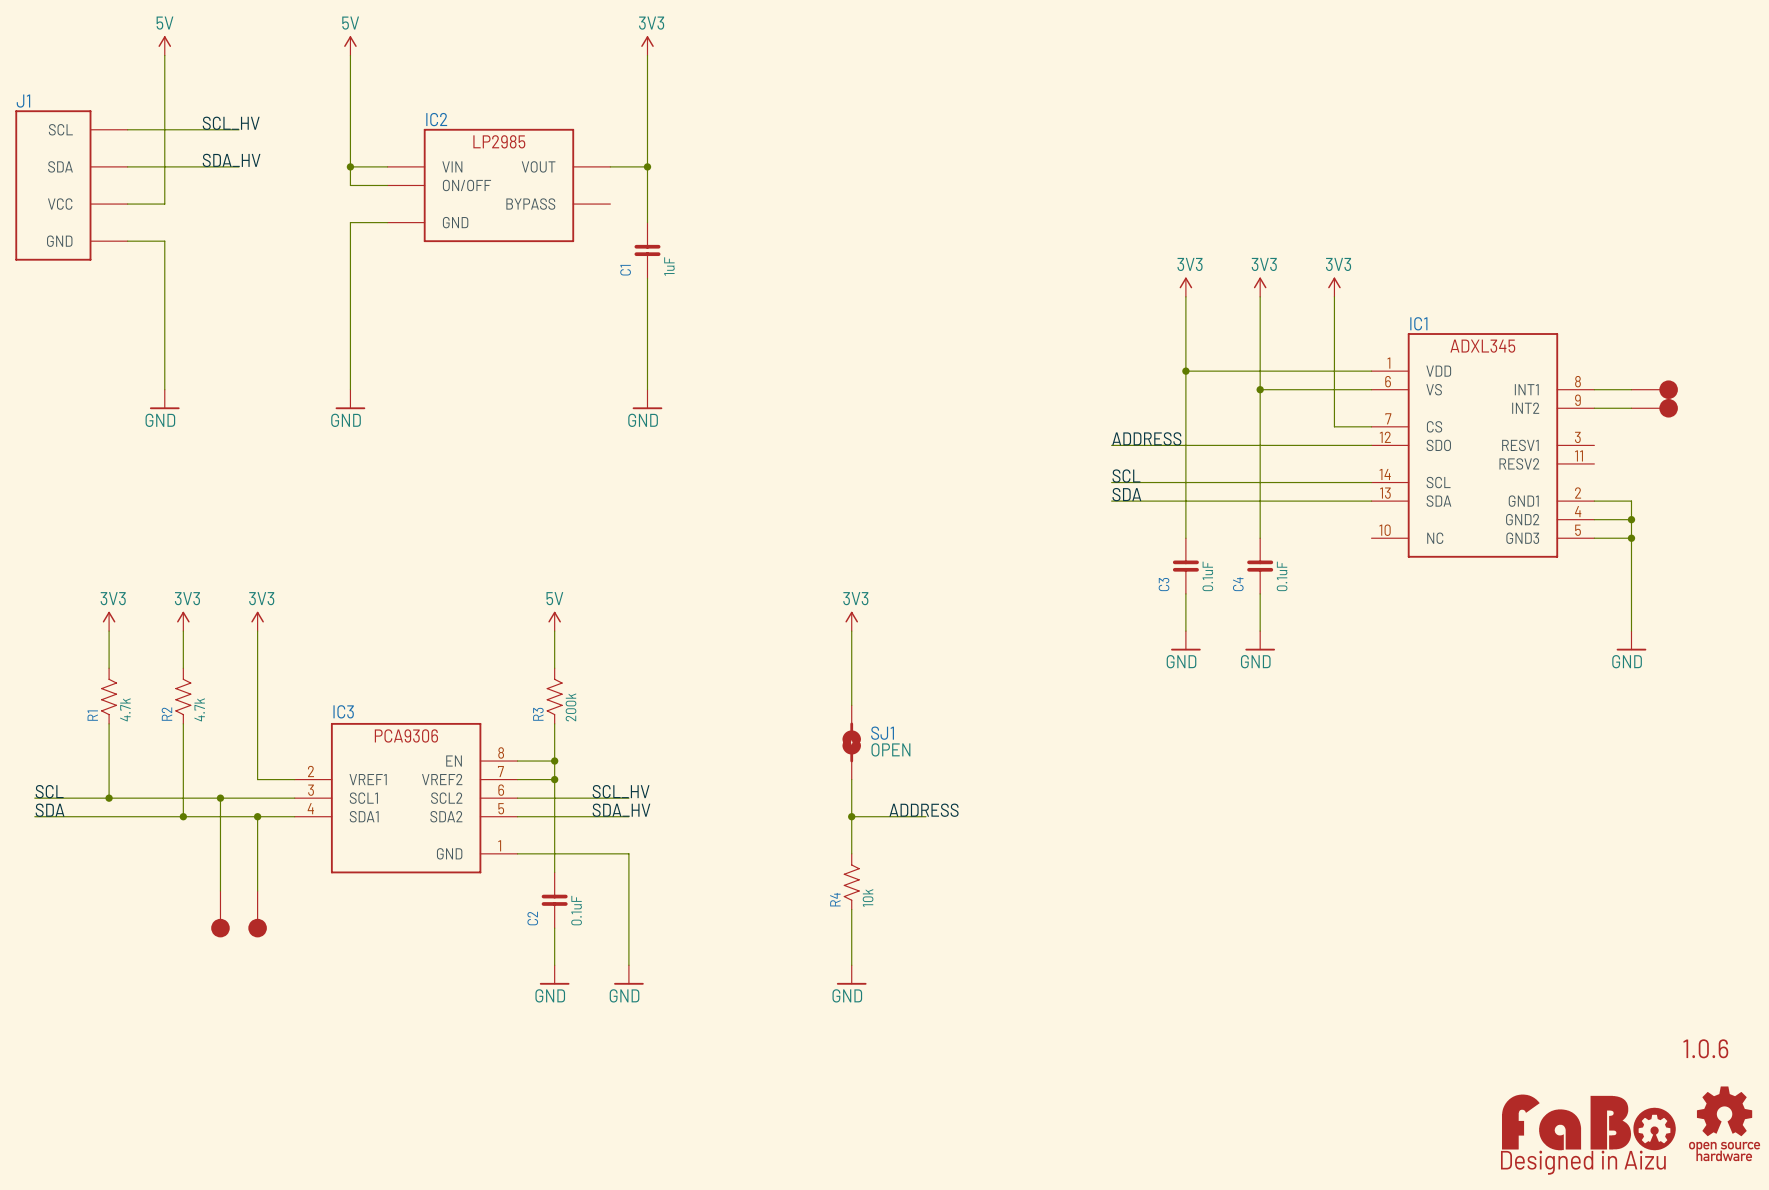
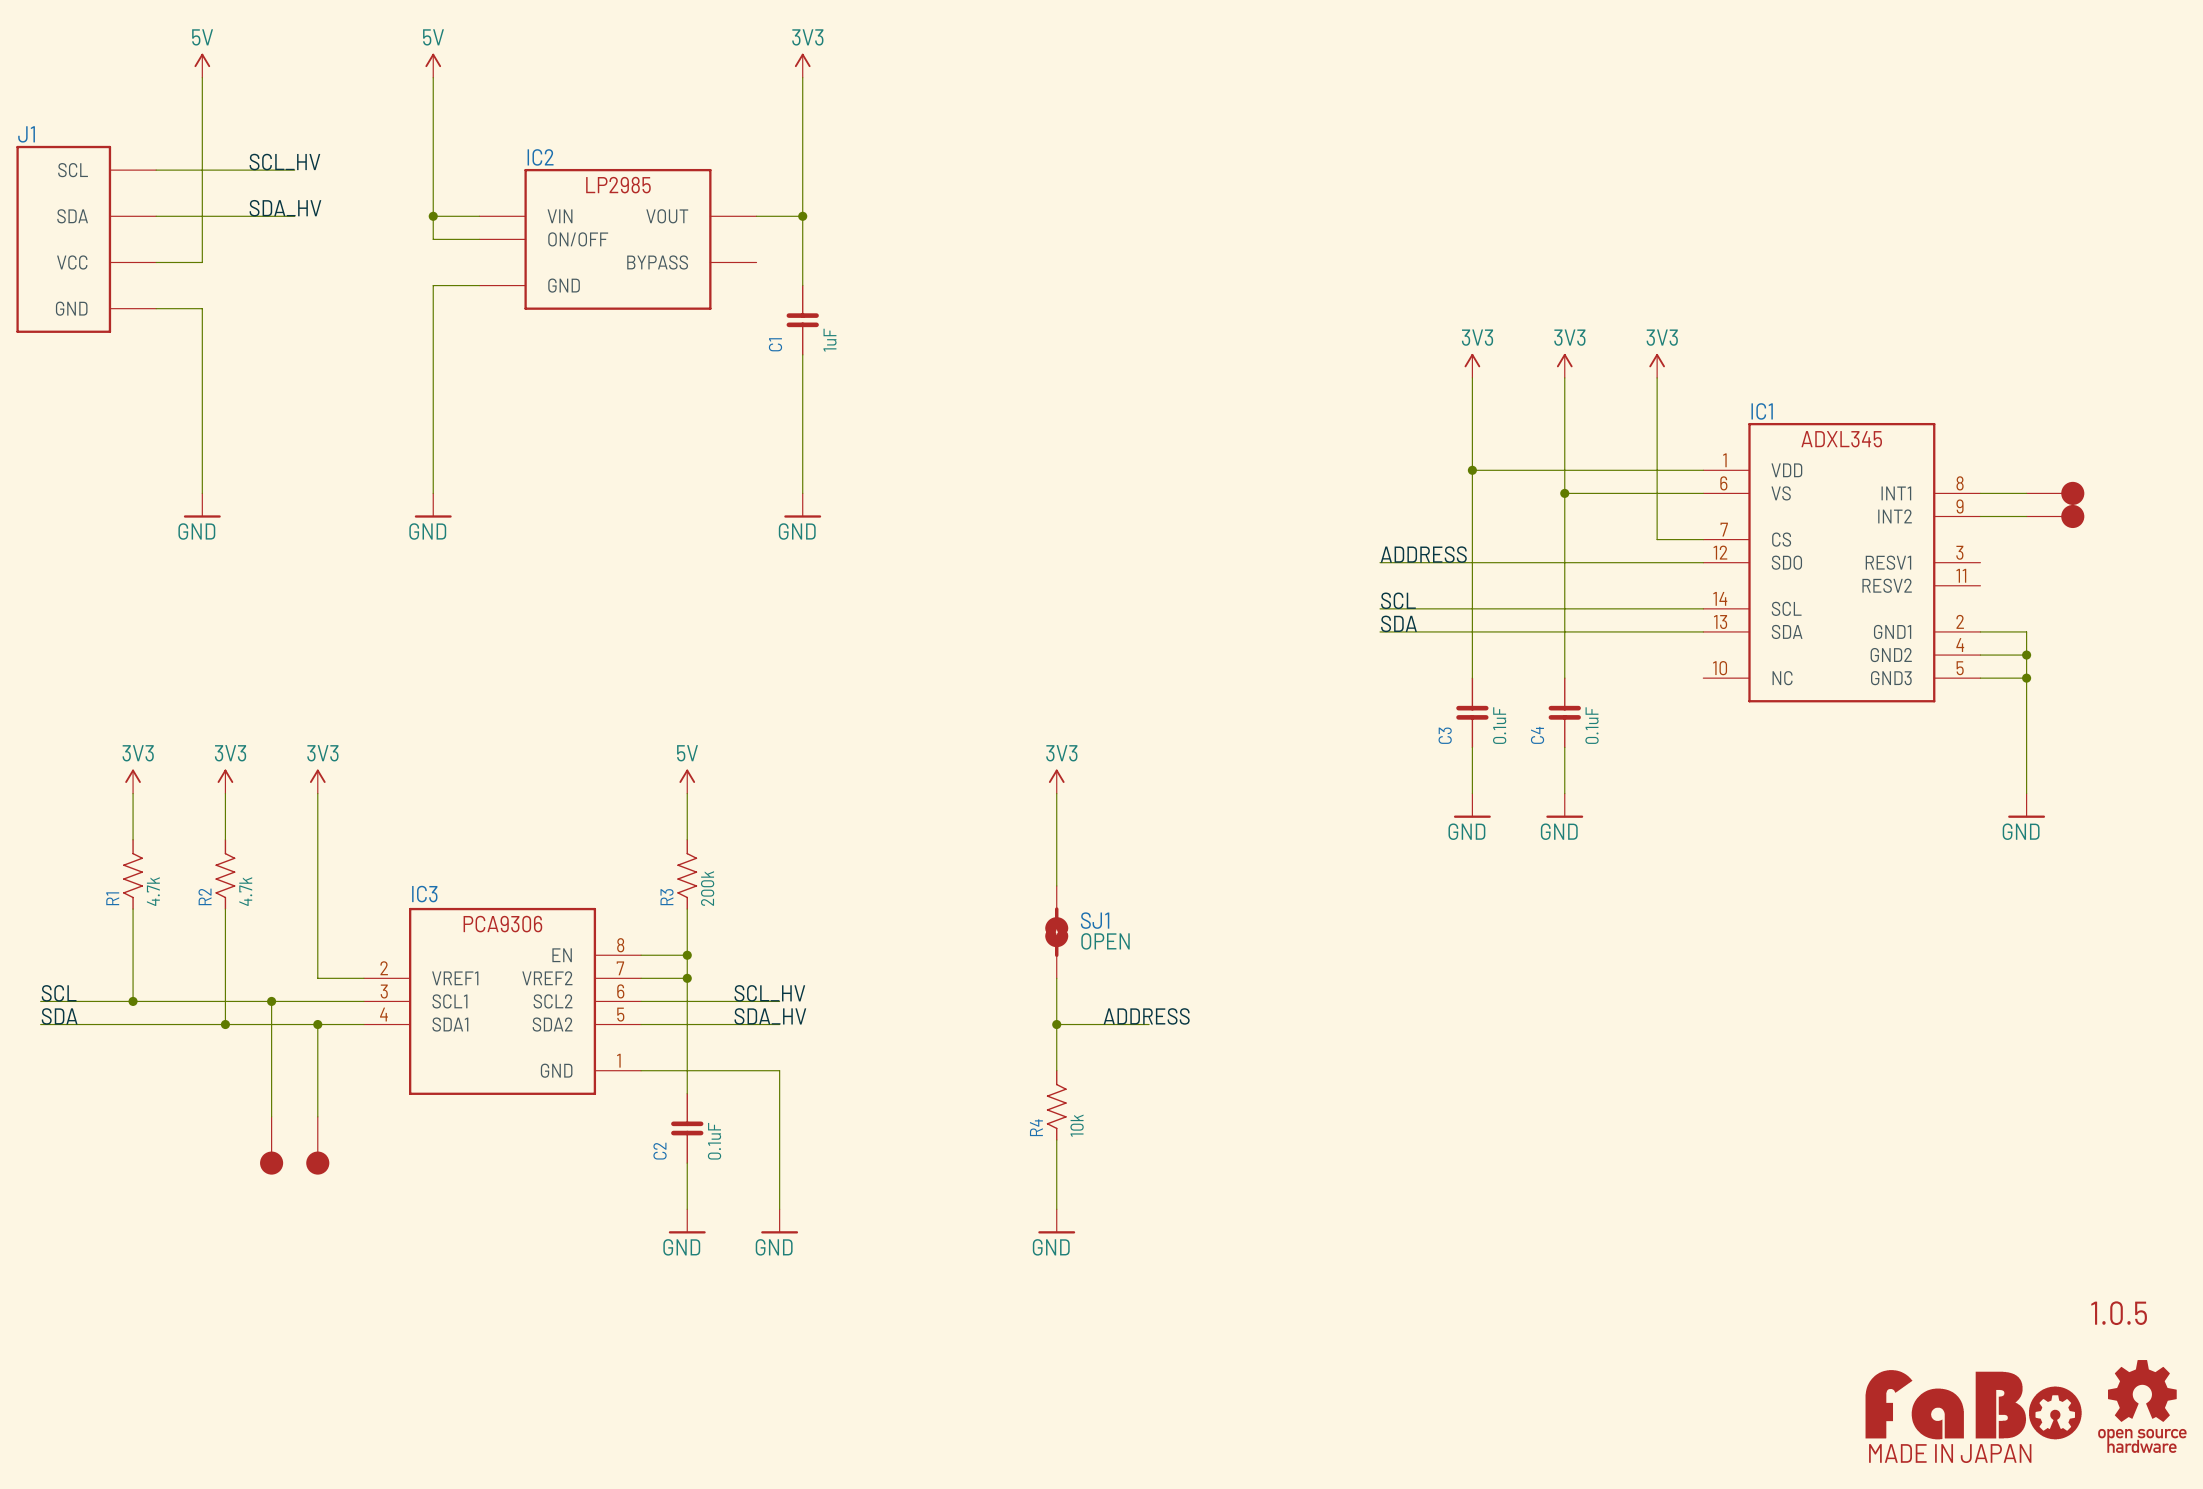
text: 1.0.6 (1705, 1048) -> 1.0.5 (2119, 1313)
part text: none -> MADE IN JAPAN (1950, 1453)
part text: Designed in Aizu (1583, 1162) -> none

